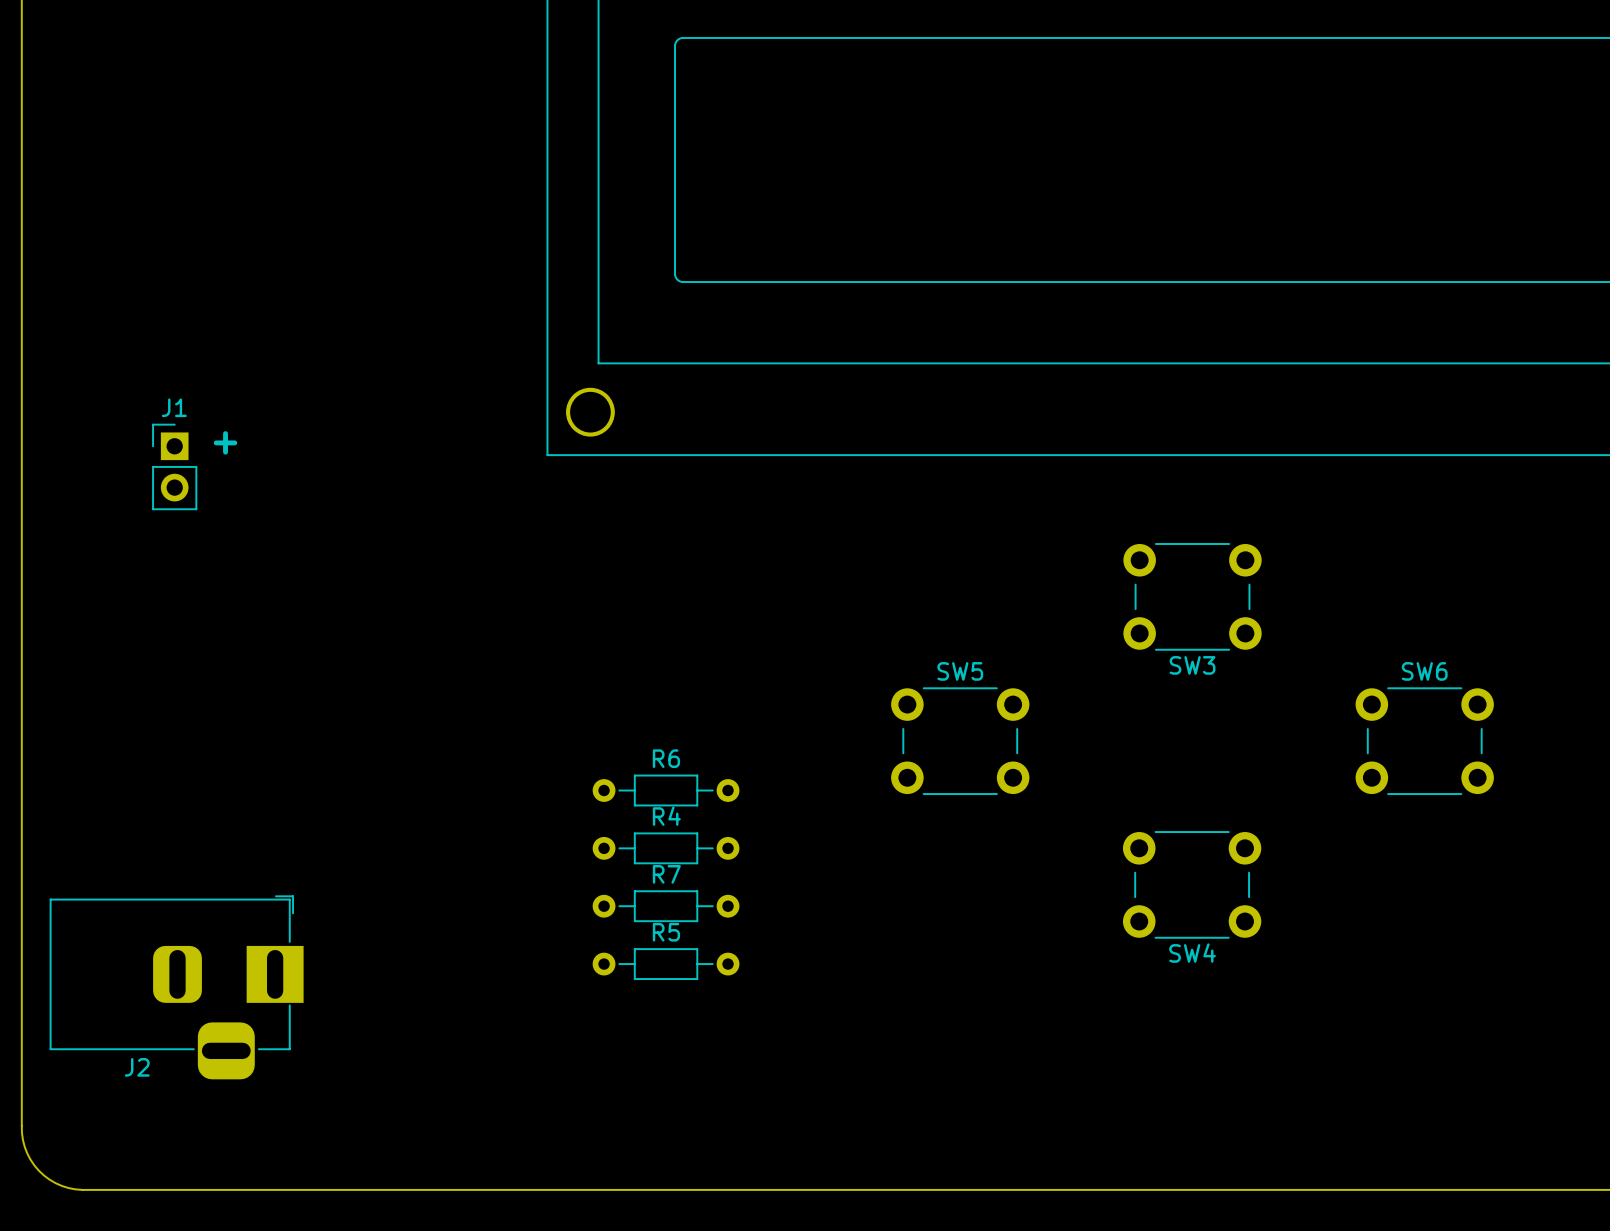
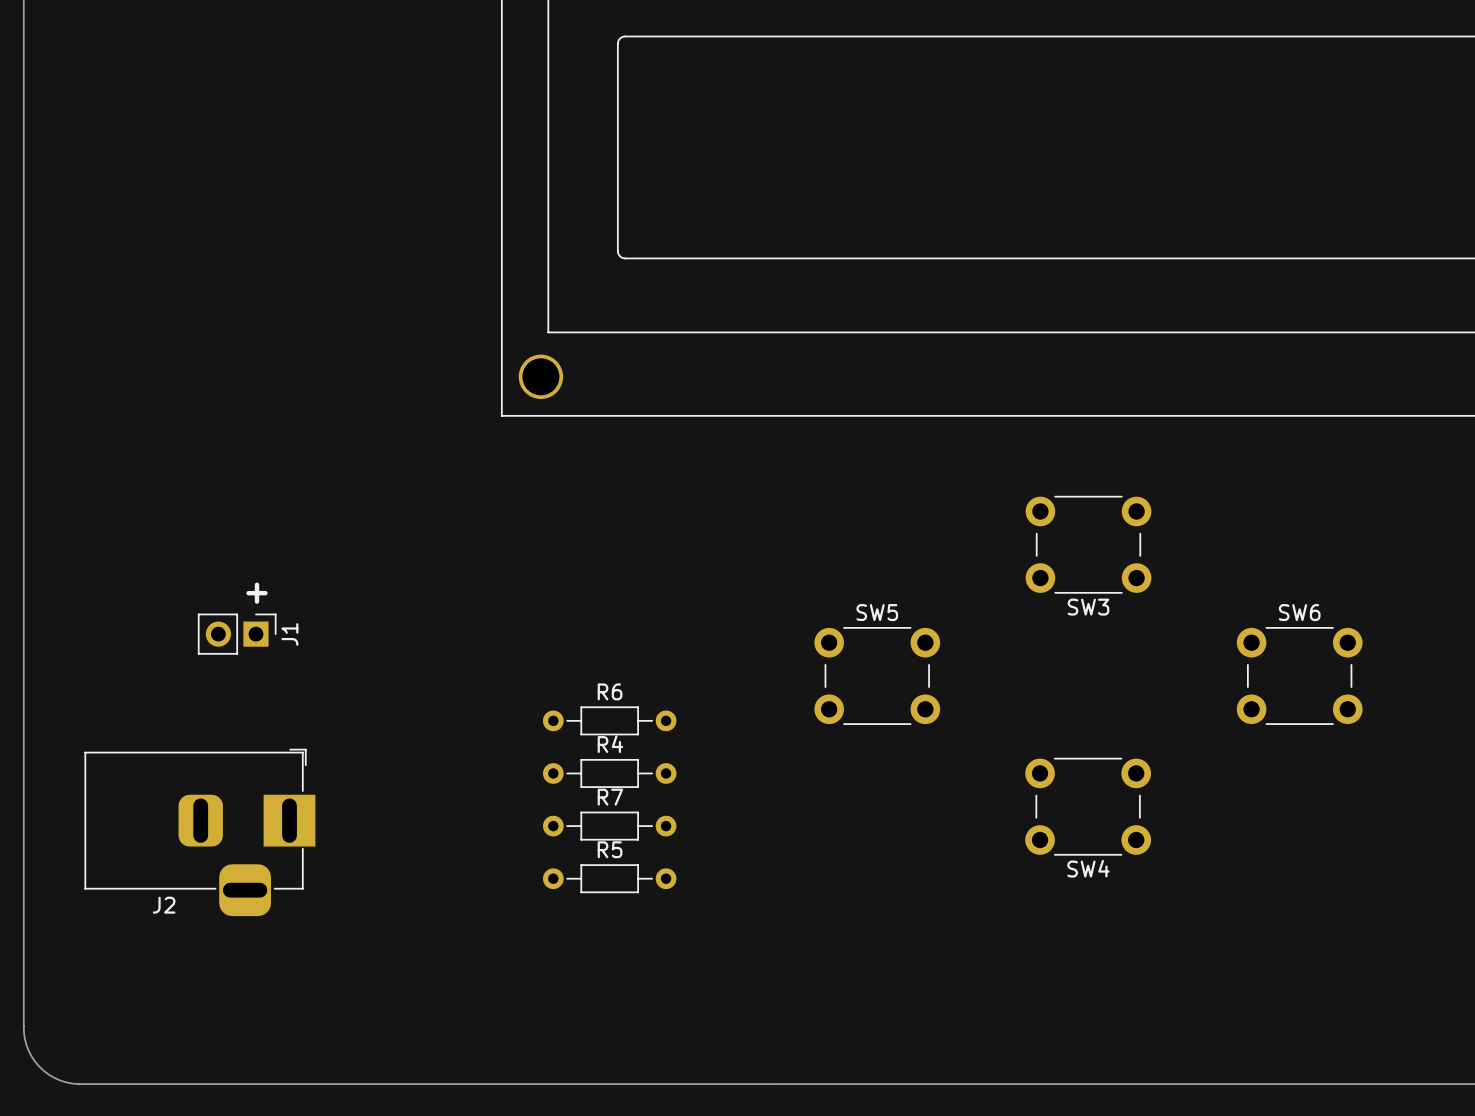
text position: + (225, 442) -> + (256, 593)
J1 rotation: 0° (174, 466) -> 90° clockwise (237, 634)
J1 position: (174, 466) -> (237, 634)
J2 position: (176, 987) -> (199, 832)

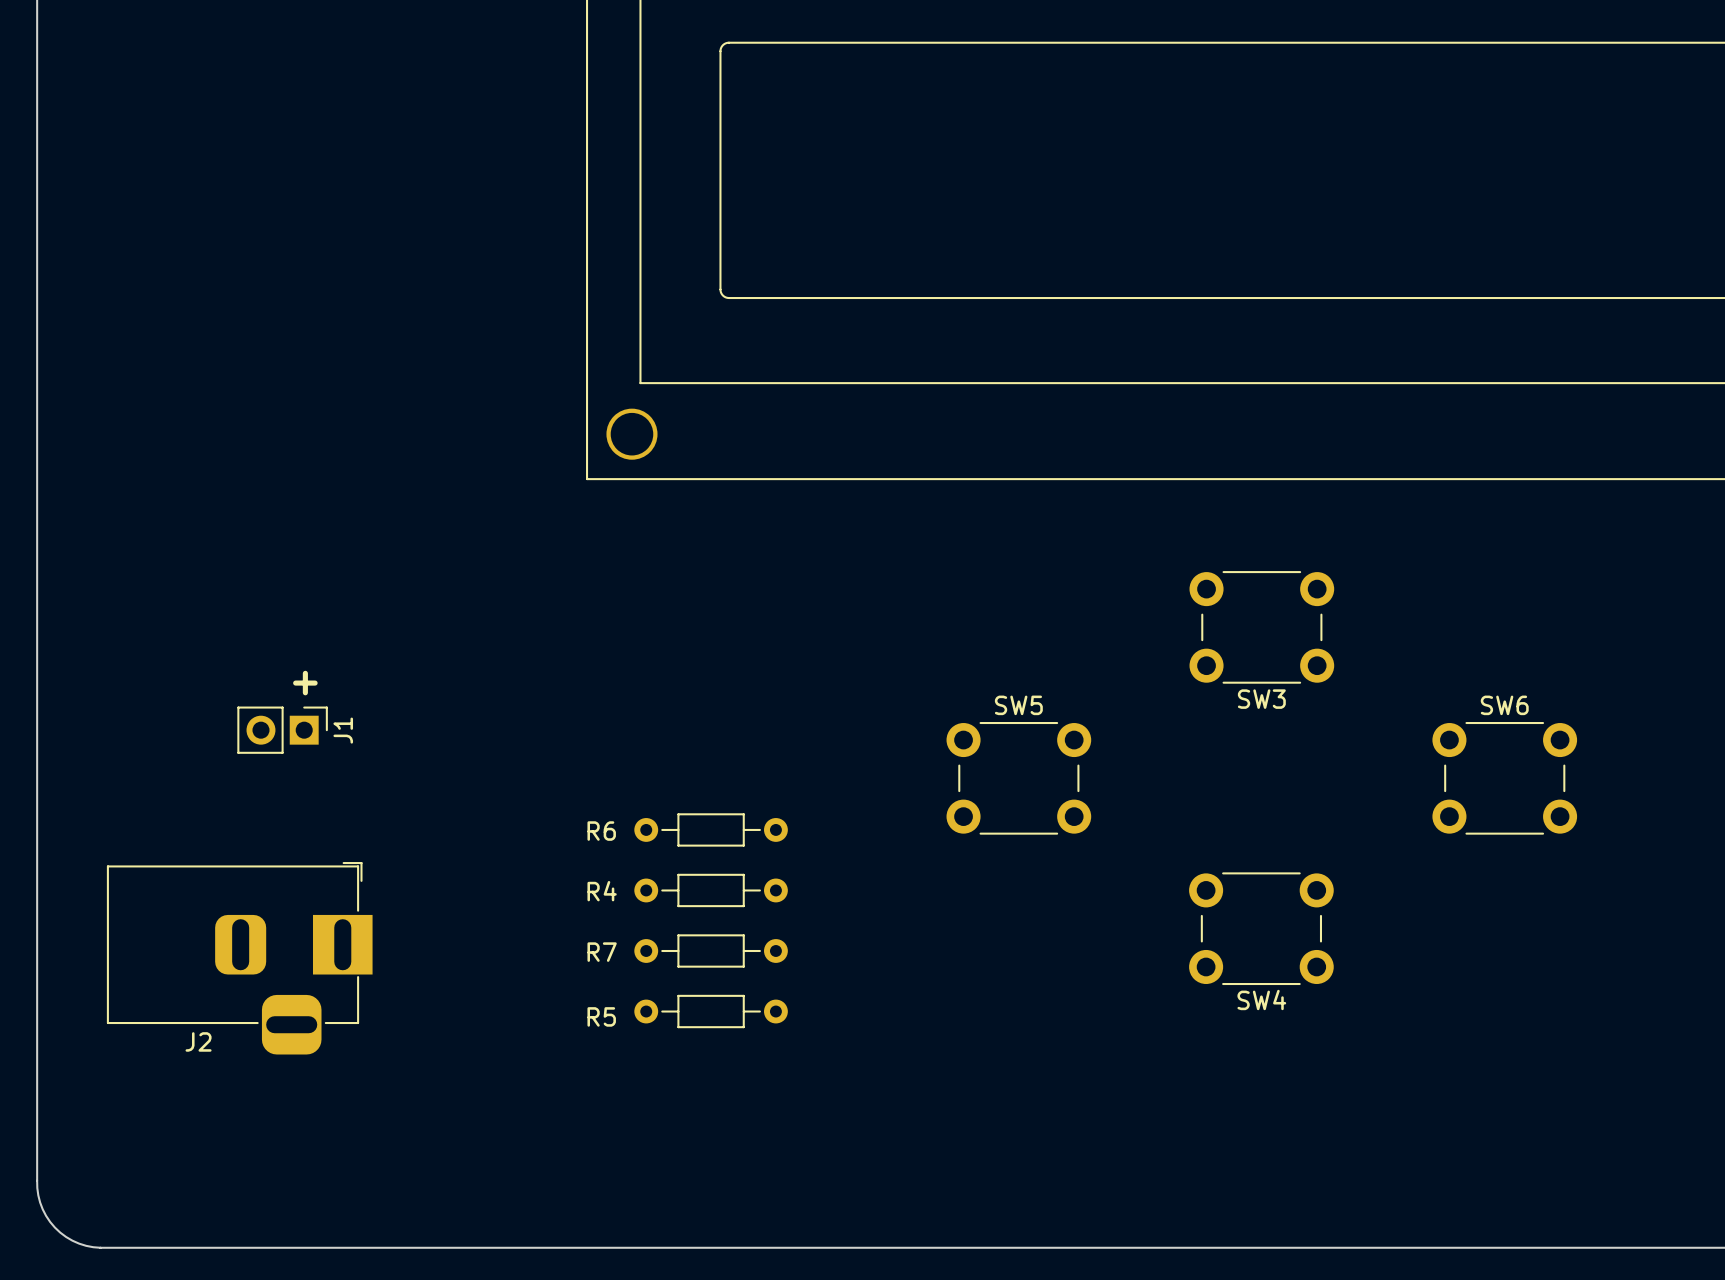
R6 name position: R6 (610, 691) -> R6 (601, 831)
R4 name position: R4 (610, 744) -> R4 (602, 891)
R7 name position: R7 (610, 797) -> R7 (602, 952)
R5 name position: R5 (610, 849) -> R5 (601, 1016)

